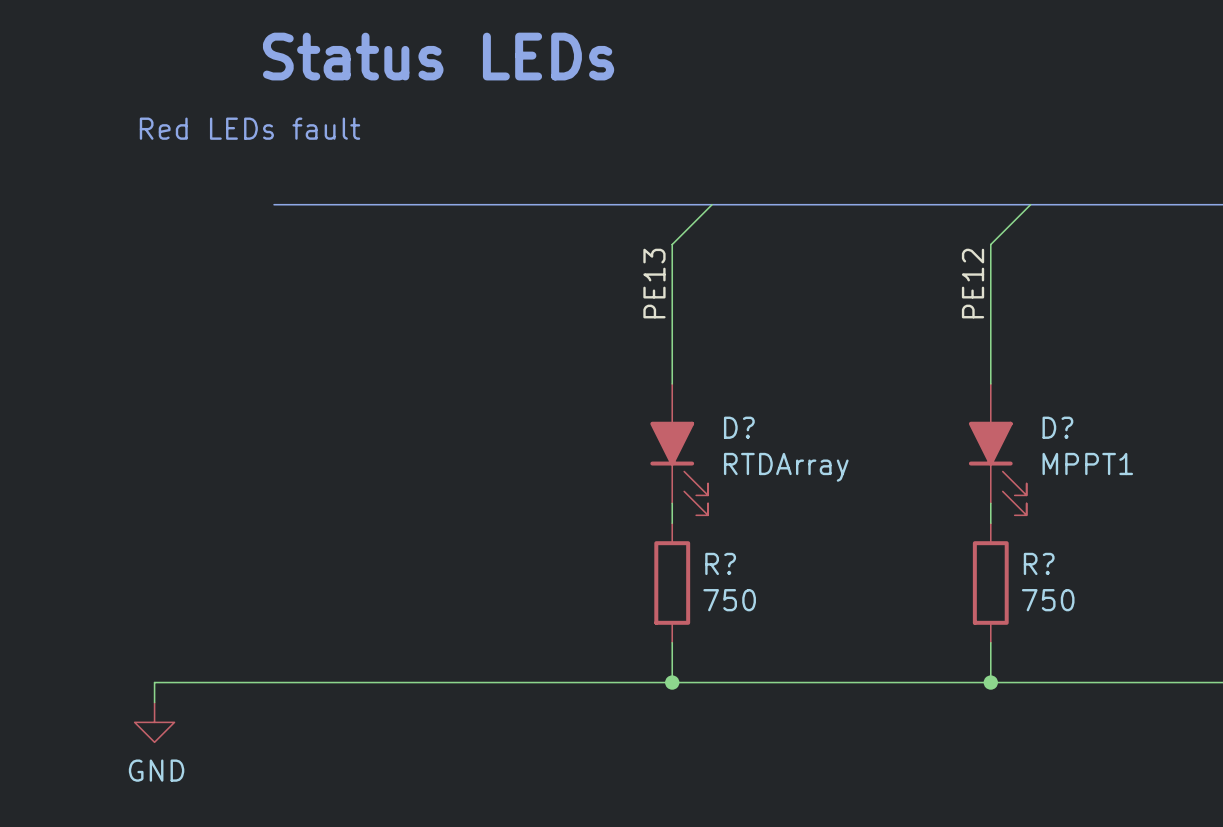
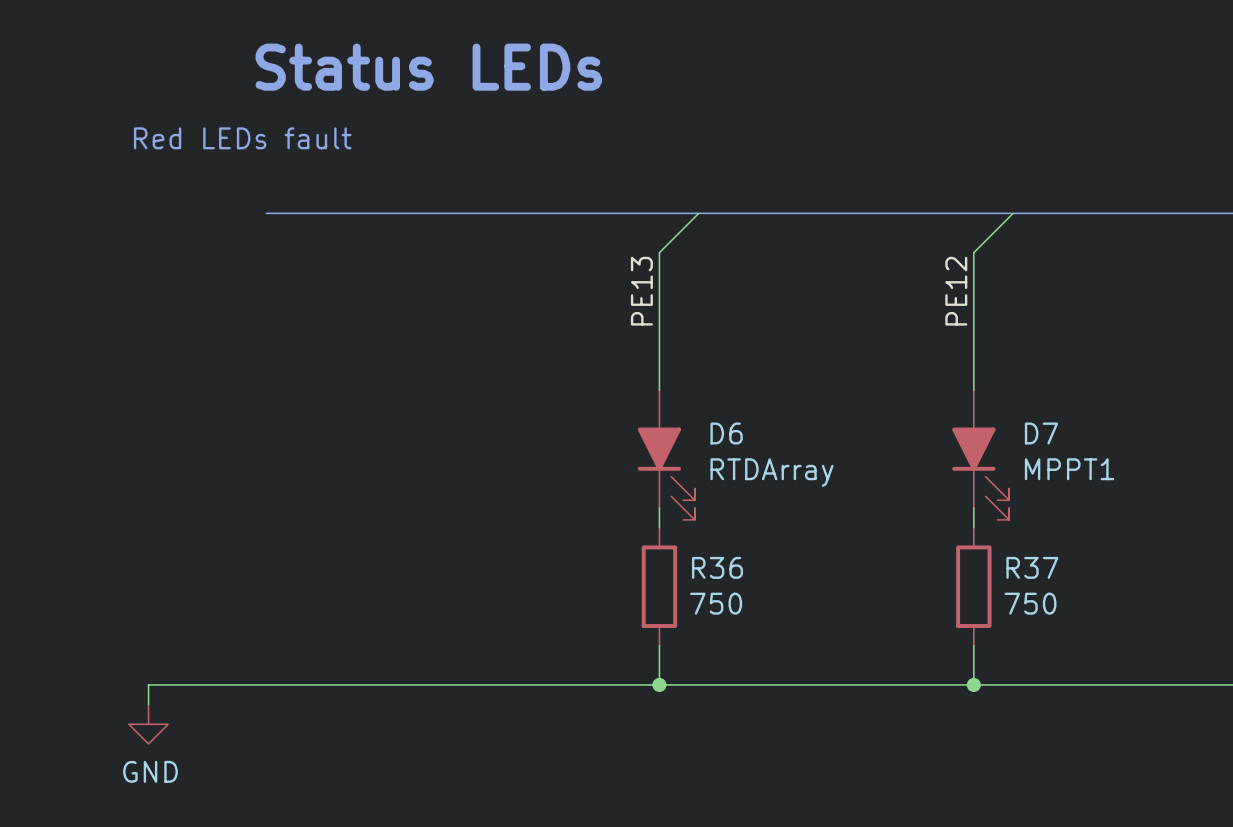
D? name: D? (739, 427) -> D6 (726, 433)
D? name: D? (1057, 427) -> D7 (1041, 433)
R? name: R? (720, 563) -> R36 (717, 567)
R? name: R? (1039, 563) -> R37 (1032, 567)

